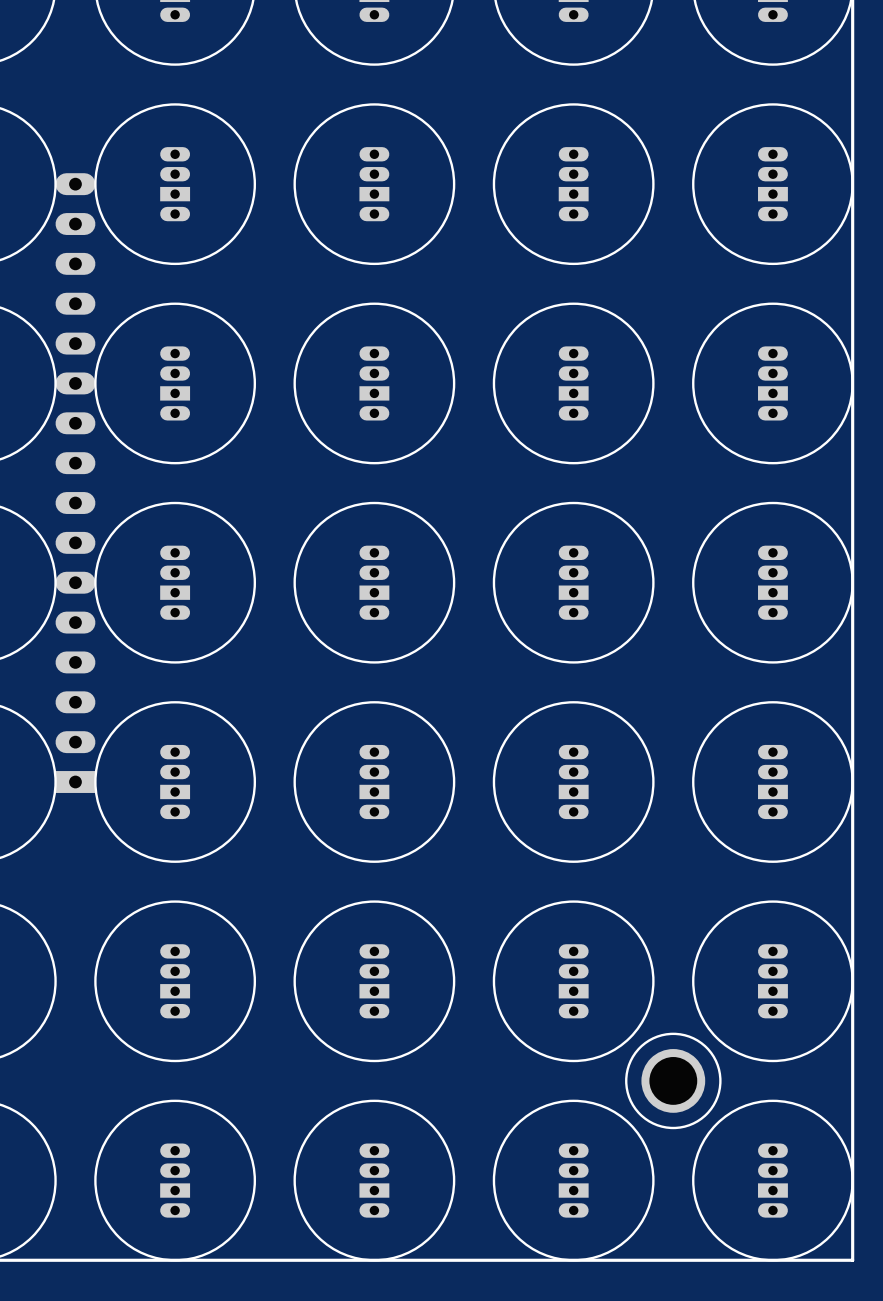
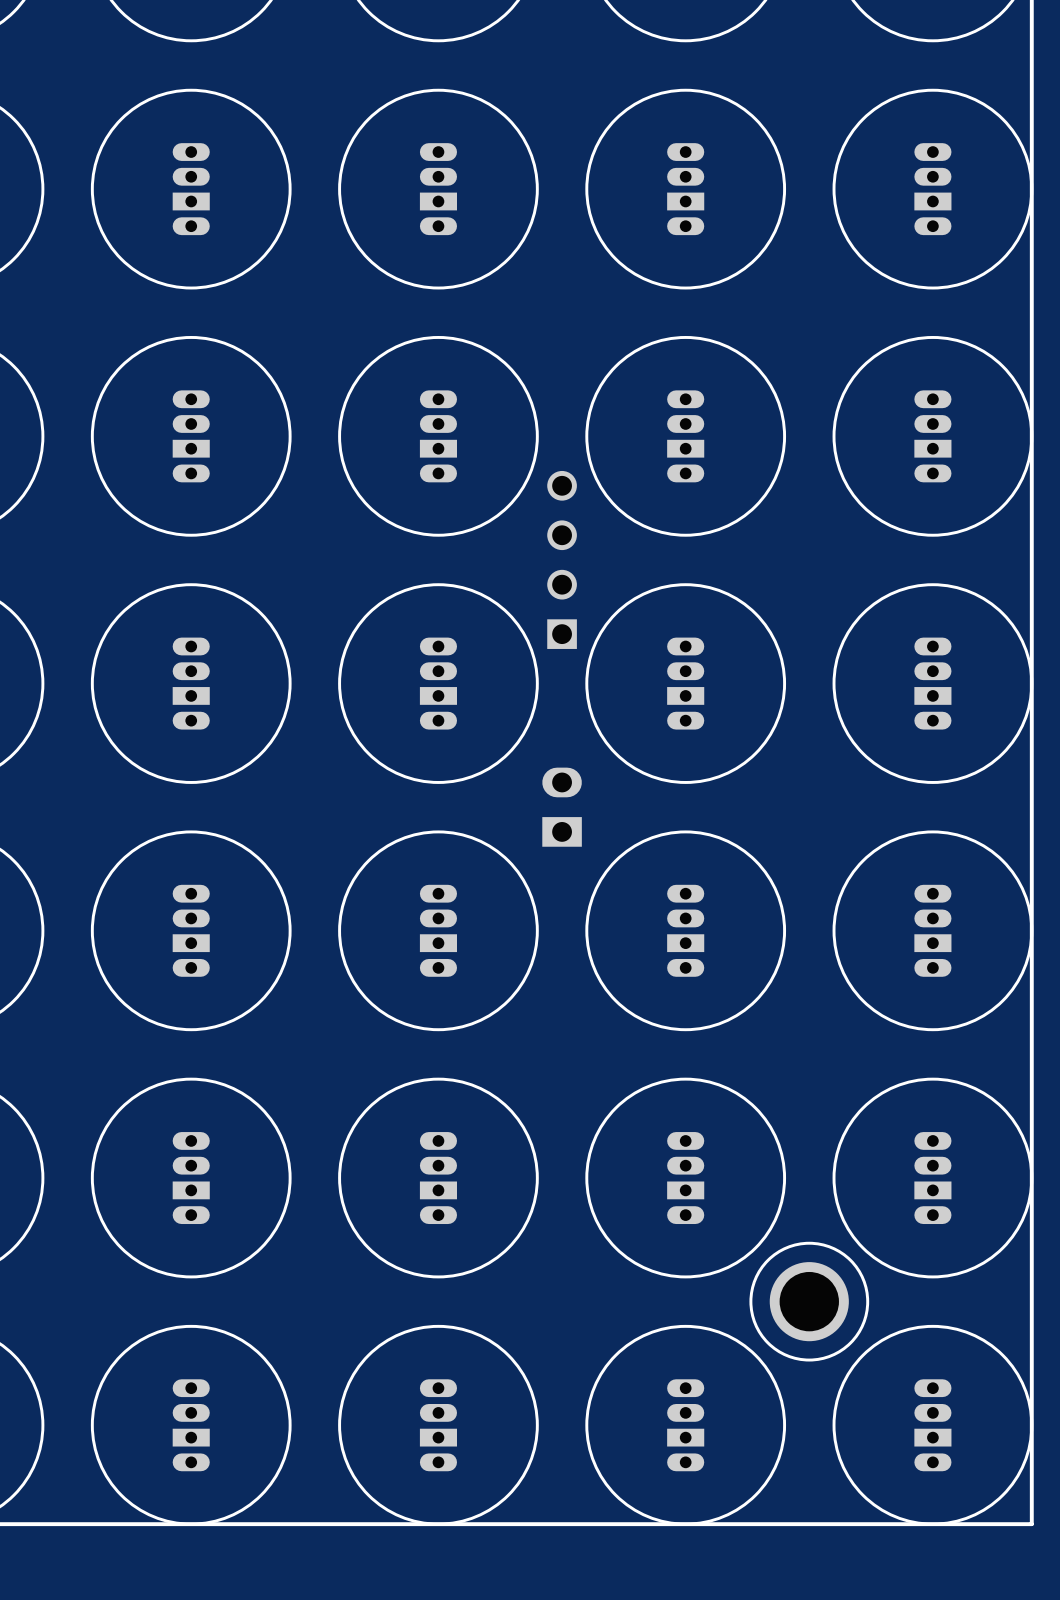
part: (75, 483) -> none
part: none -> (562, 559)
part: none -> (562, 807)

